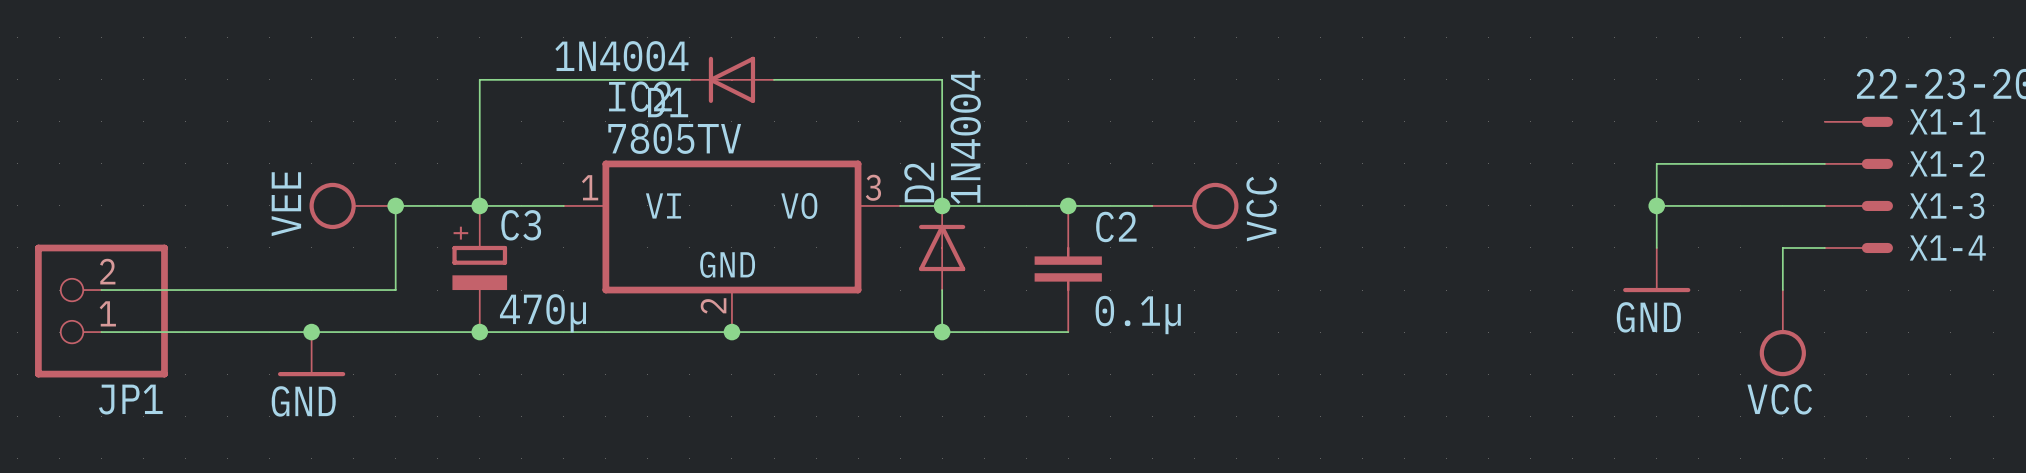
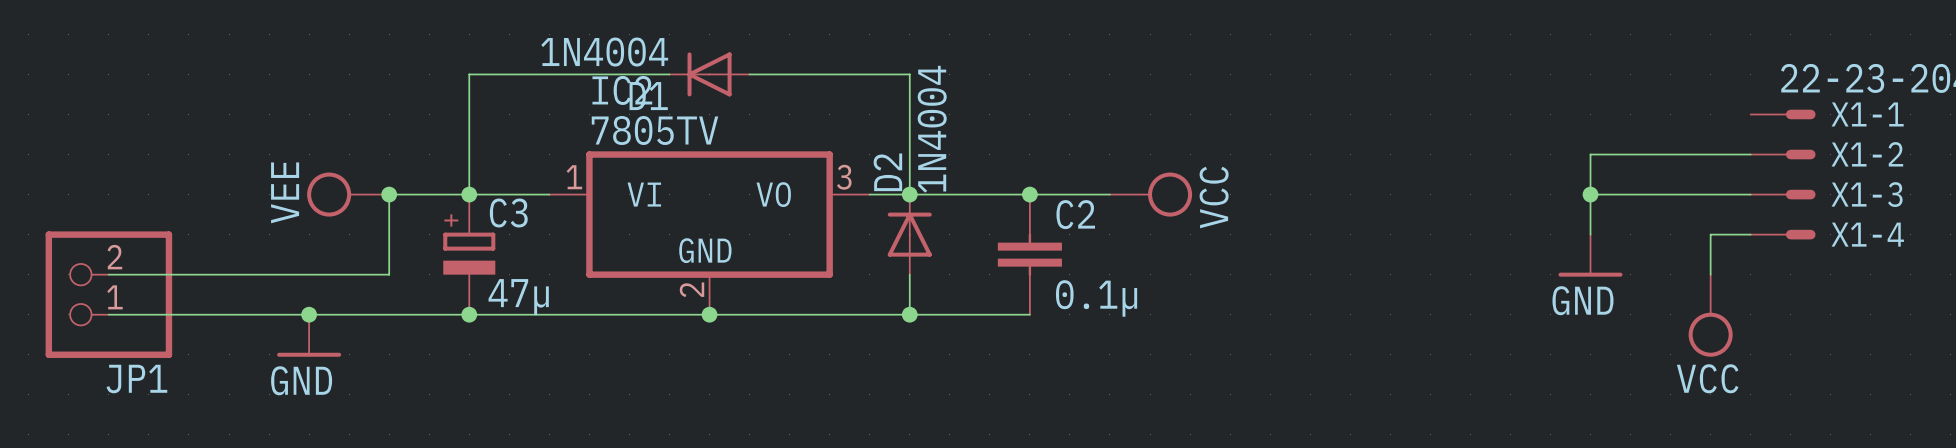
C3 value: 470µ (542, 313) -> 47µ (518, 297)

